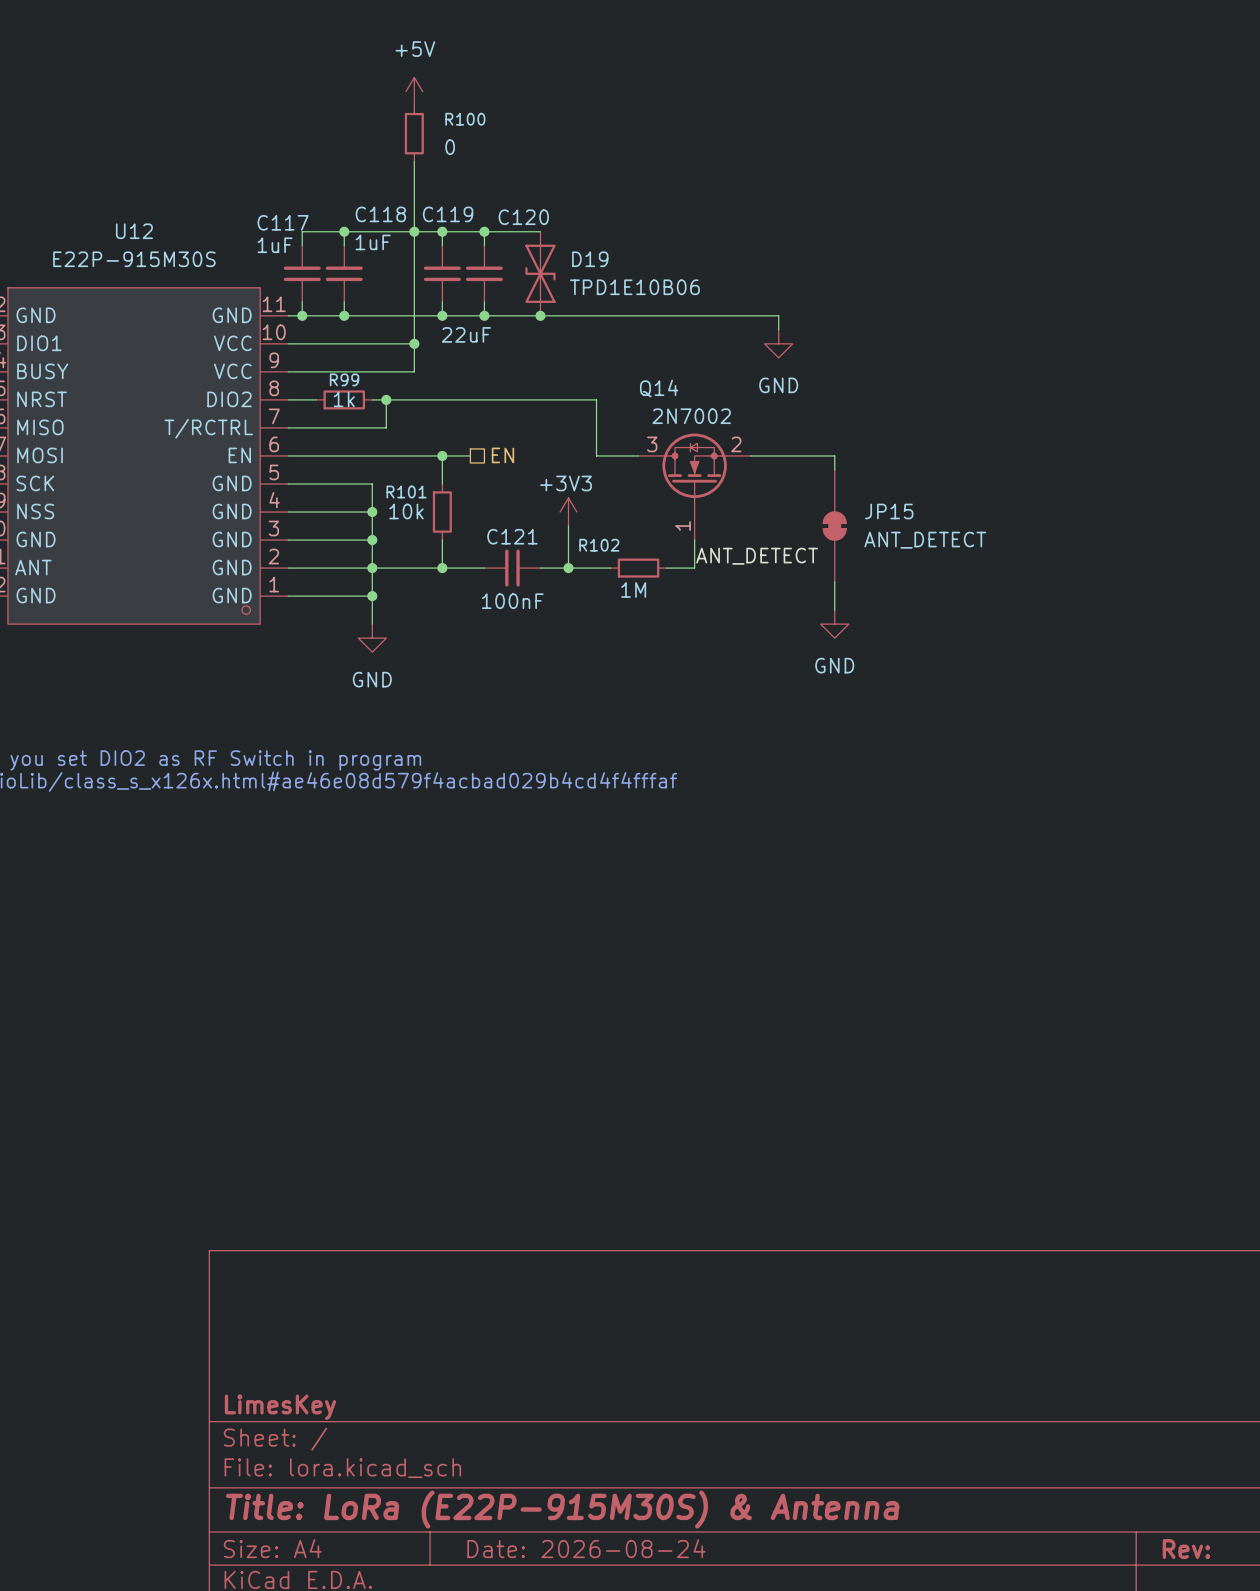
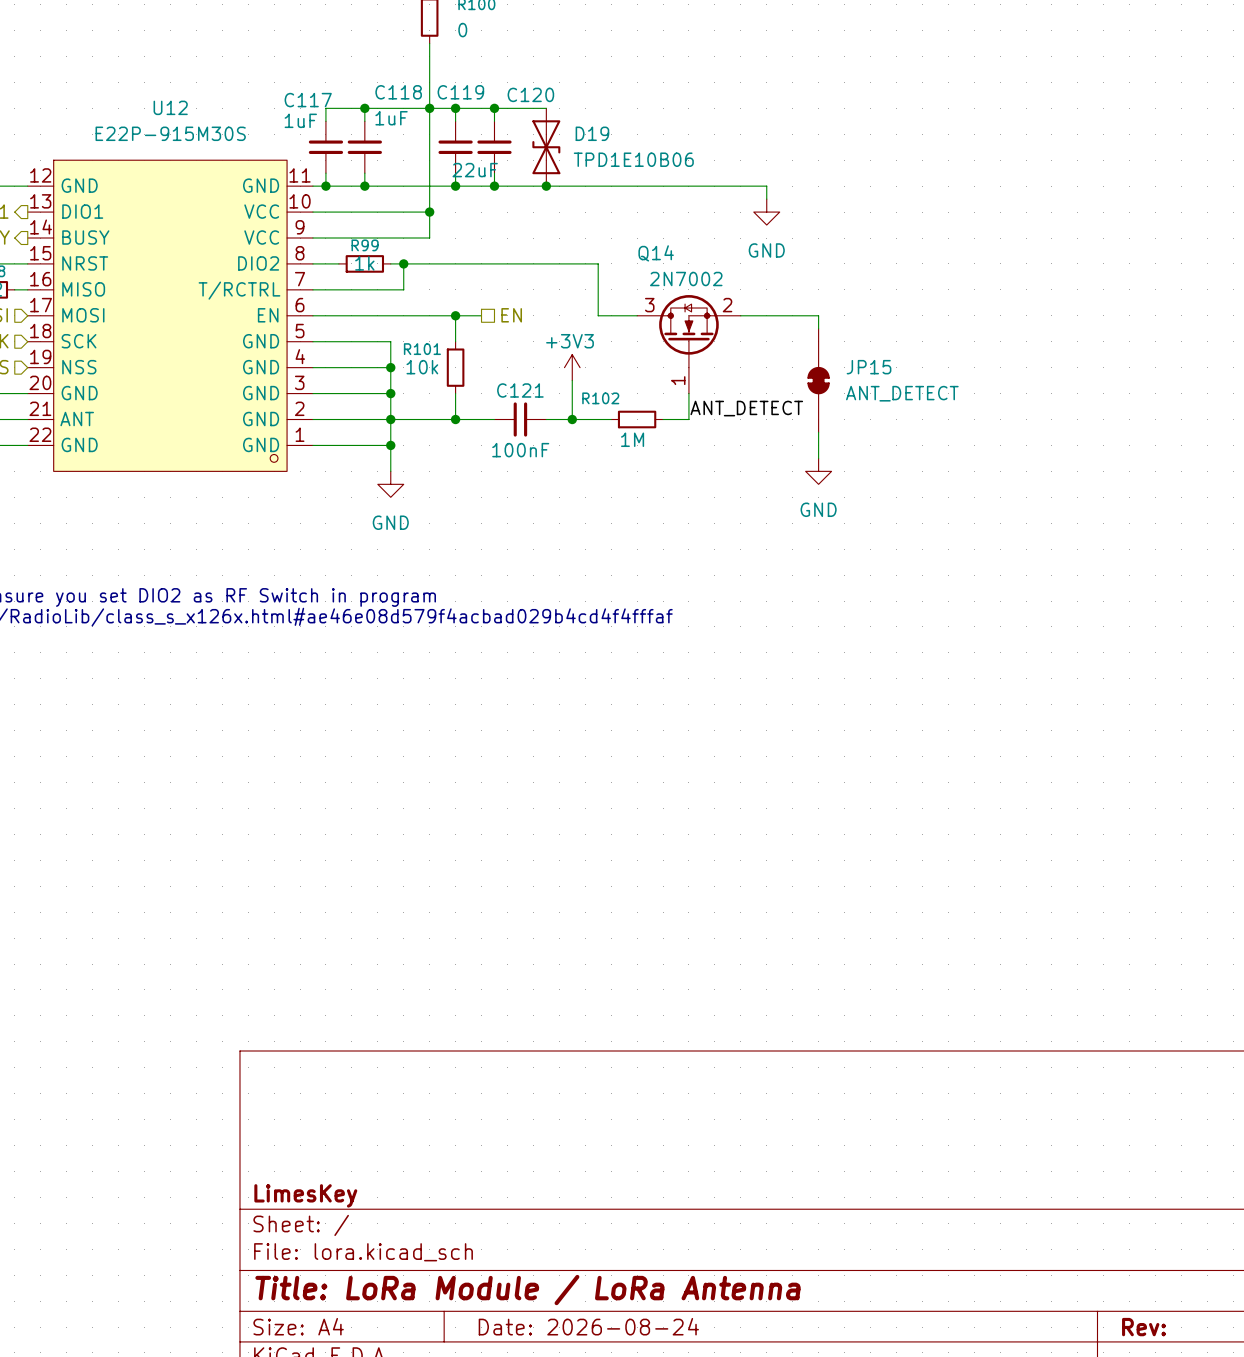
C119 value position: 22uF (466, 334) -> 22uF (475, 170)
title block: Title: LoRa (E22P-915M30S) & Antenna (562, 1509) -> Title: LoRa Module / LoRa Antenna (528, 1290)

